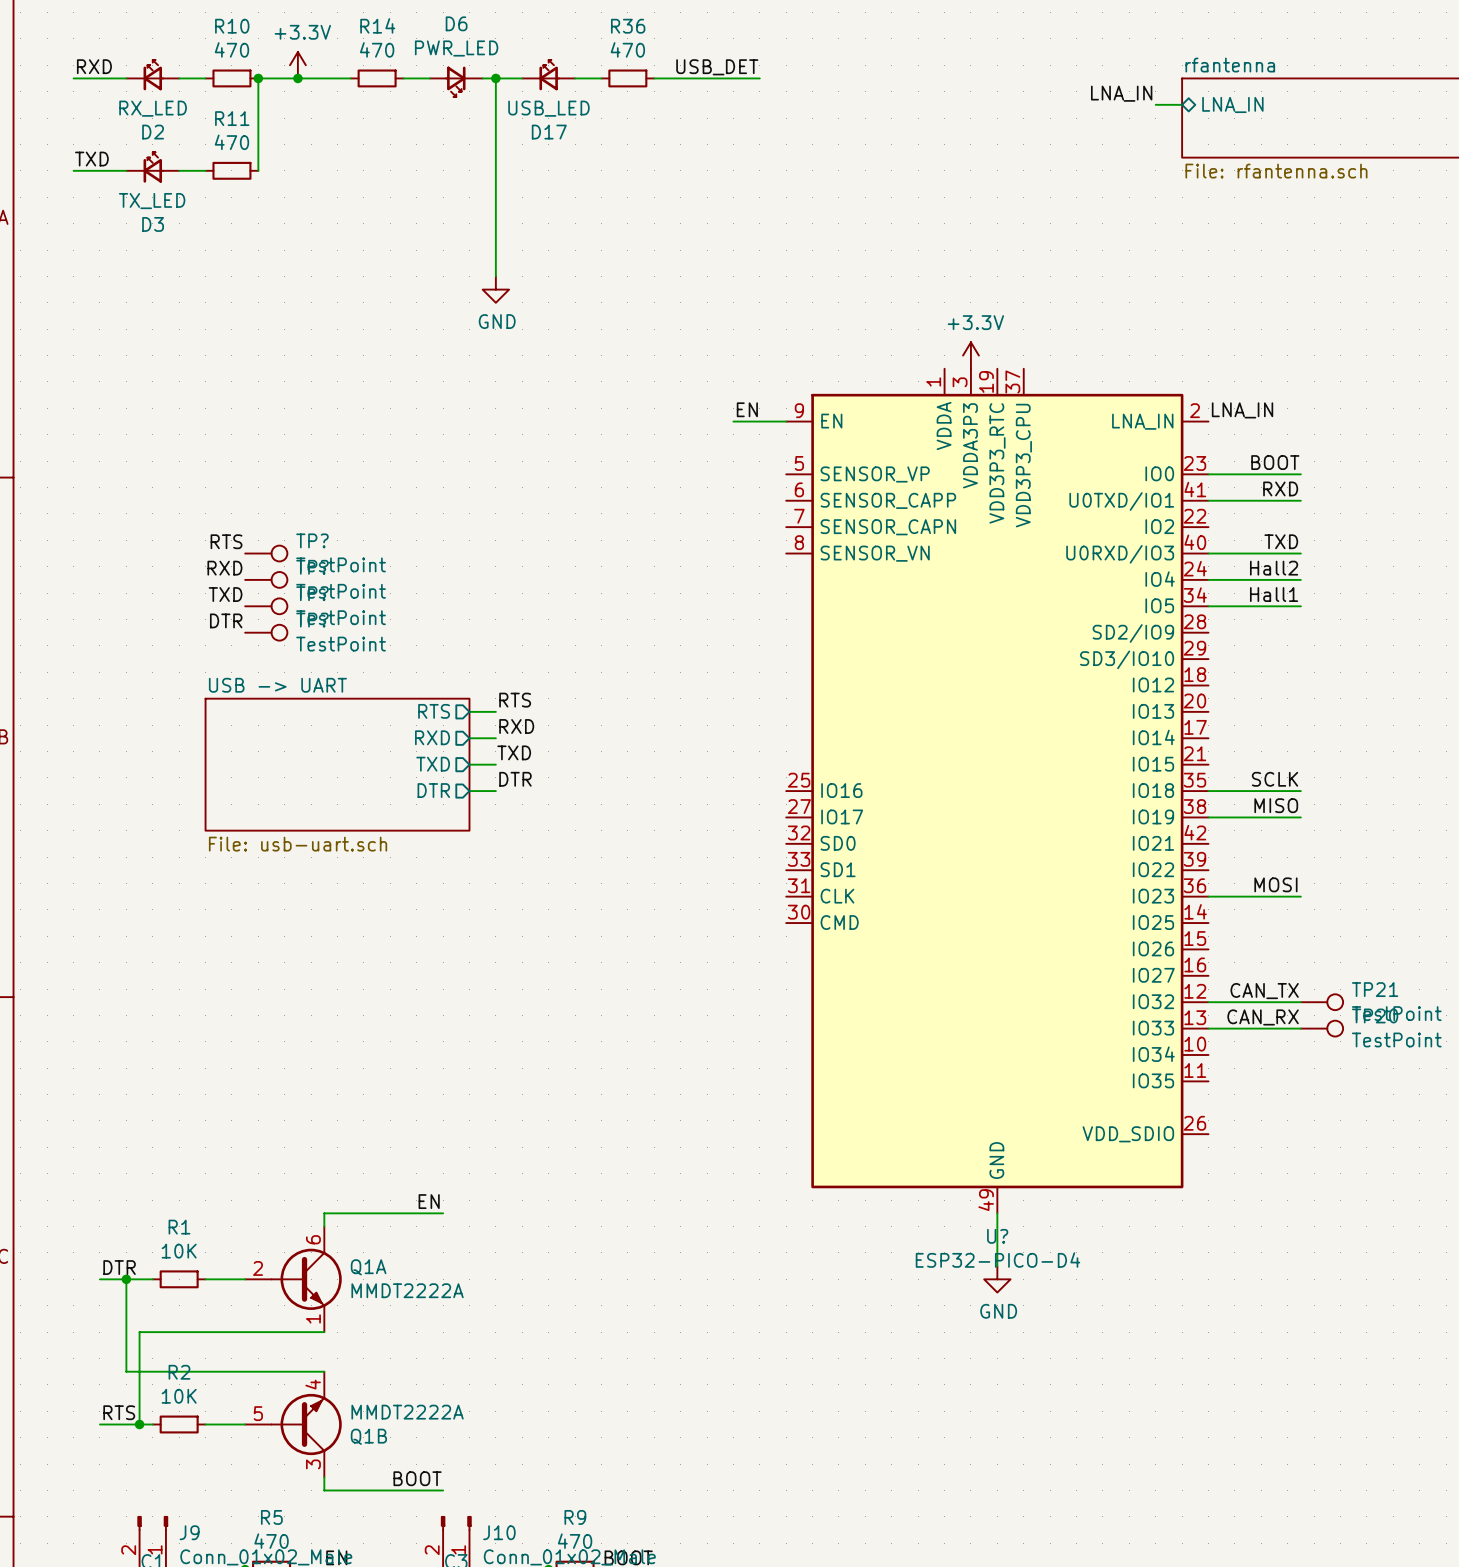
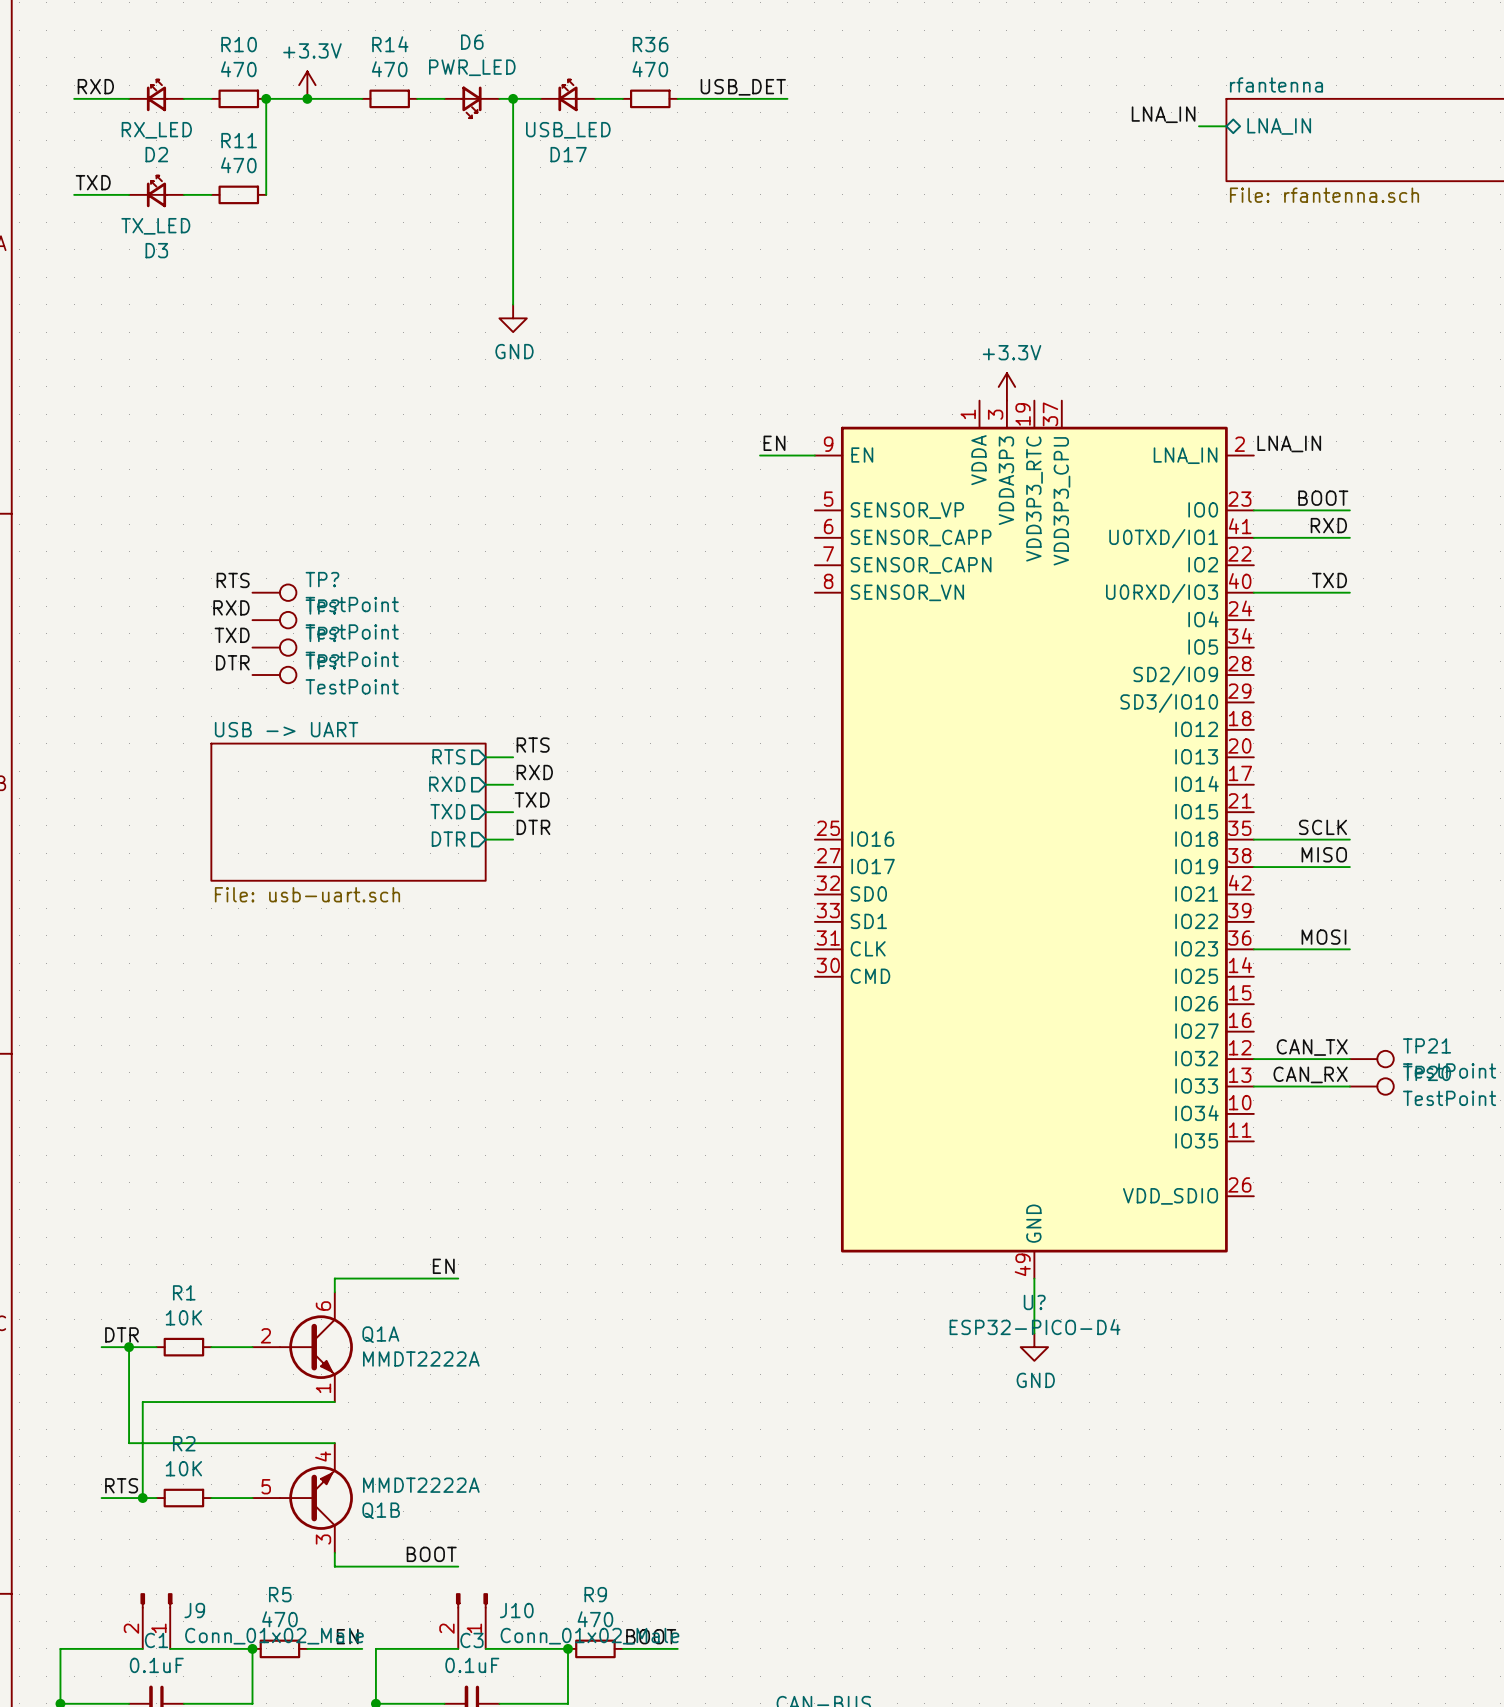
label: Hall2 (1274, 568) -> none
wire: (1208, 579) (1300, 579) -> none
label: Hall1 (1274, 594) -> none
wire: (1208, 606) (1300, 606) -> none

